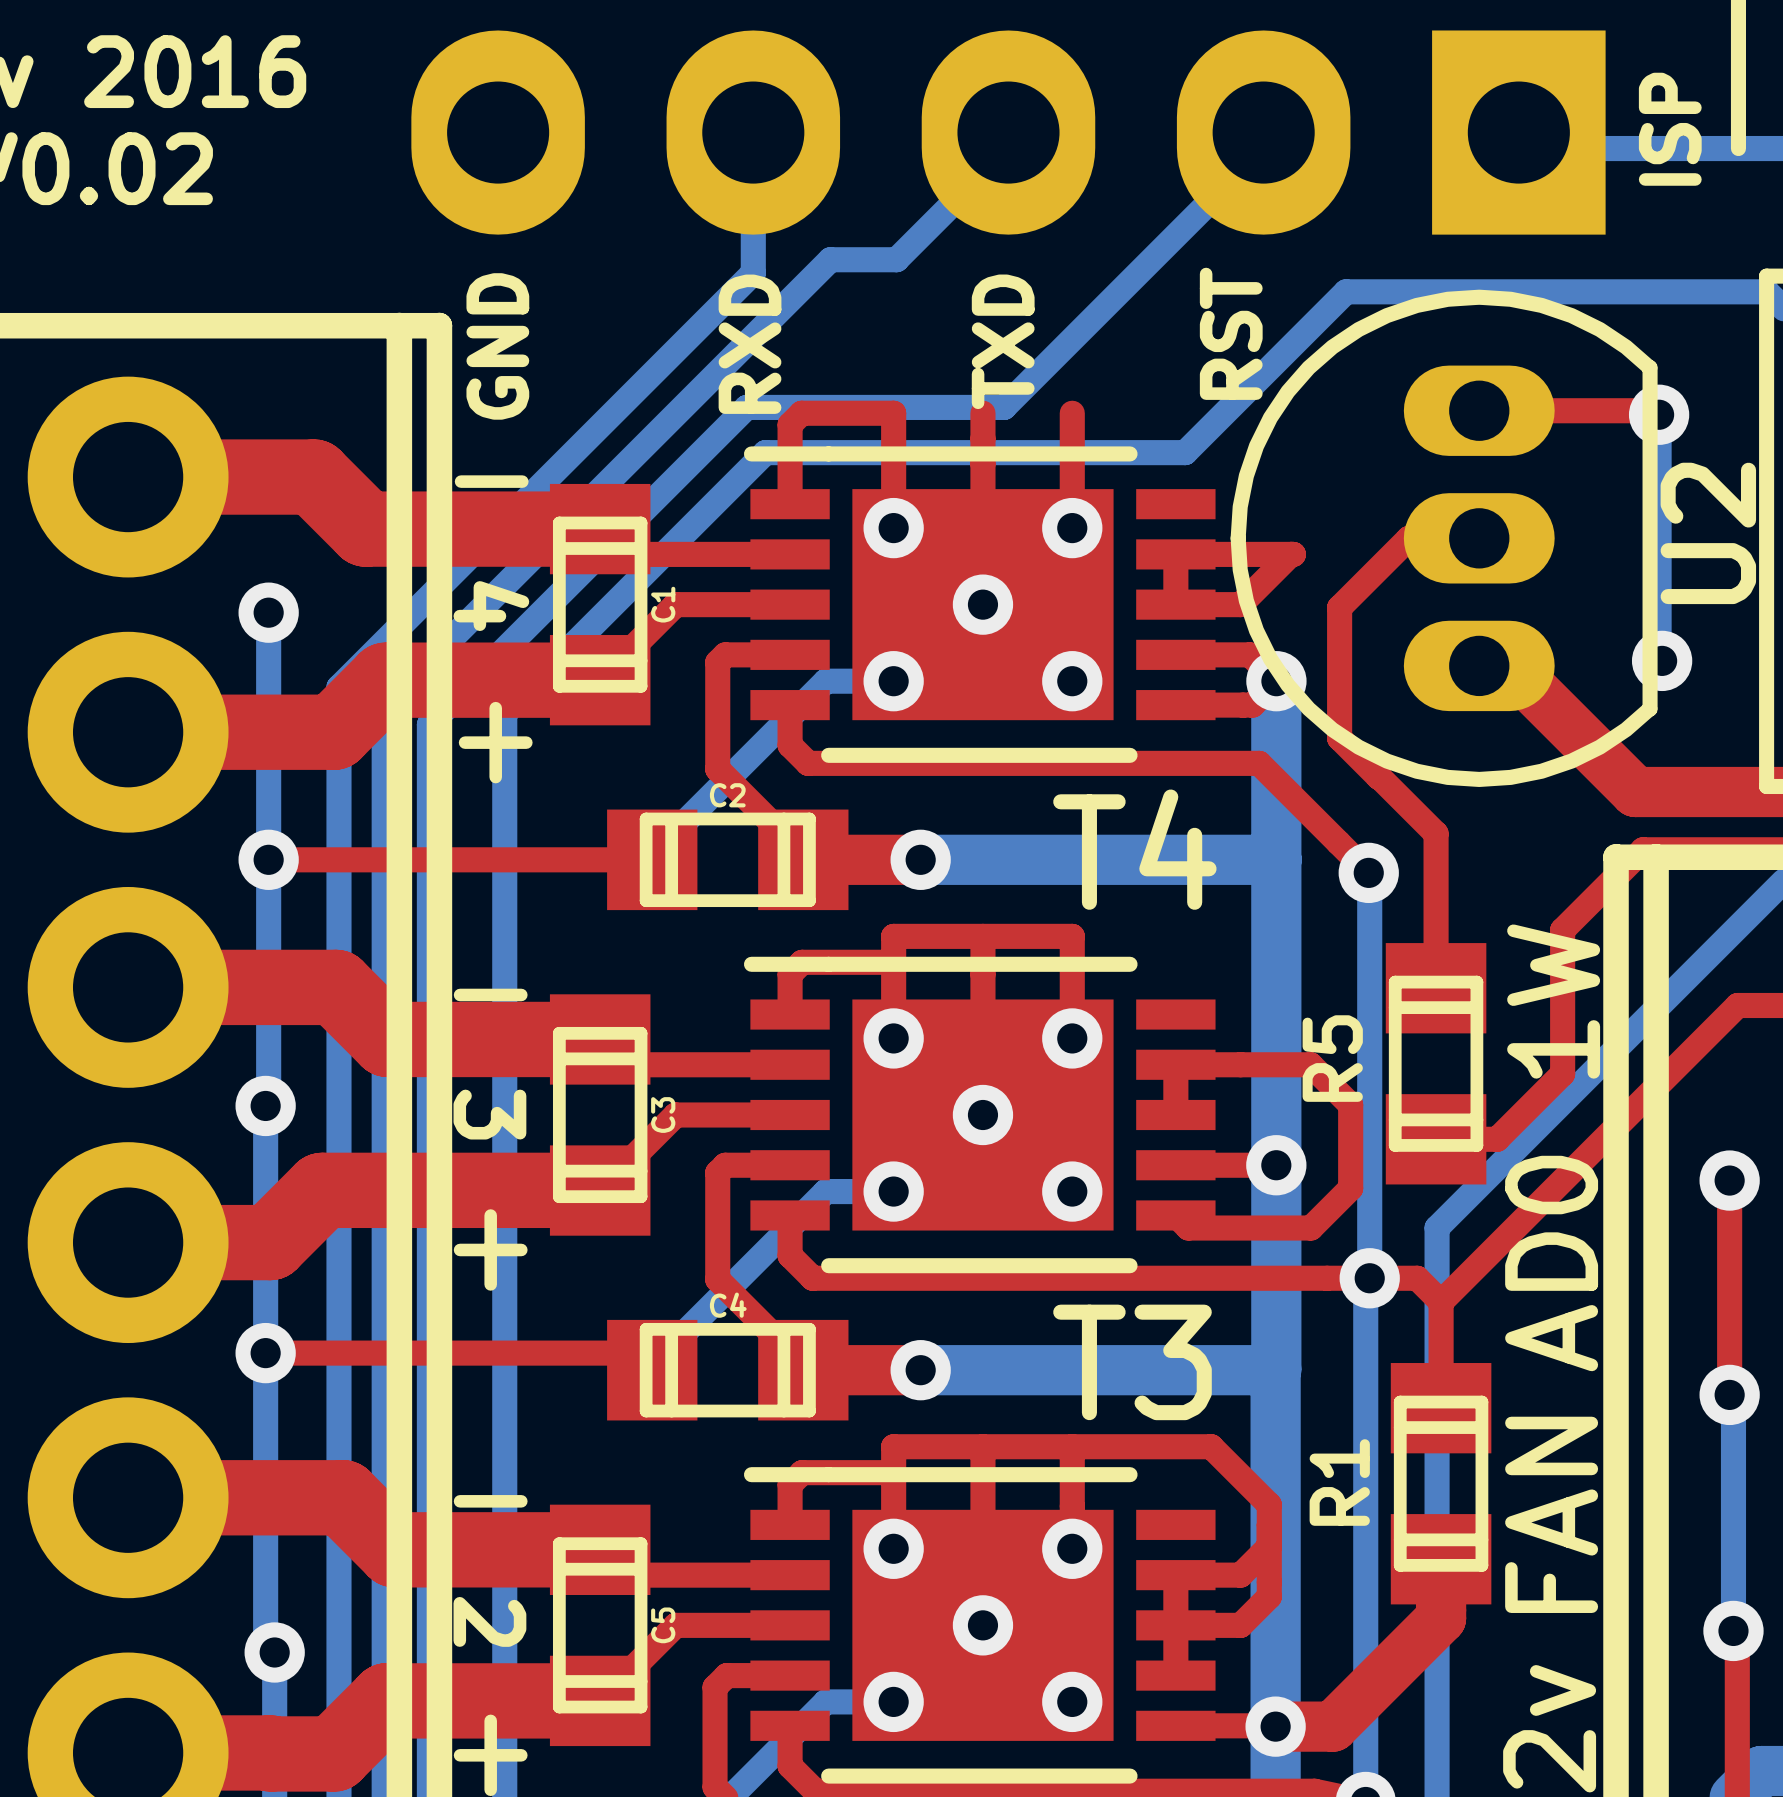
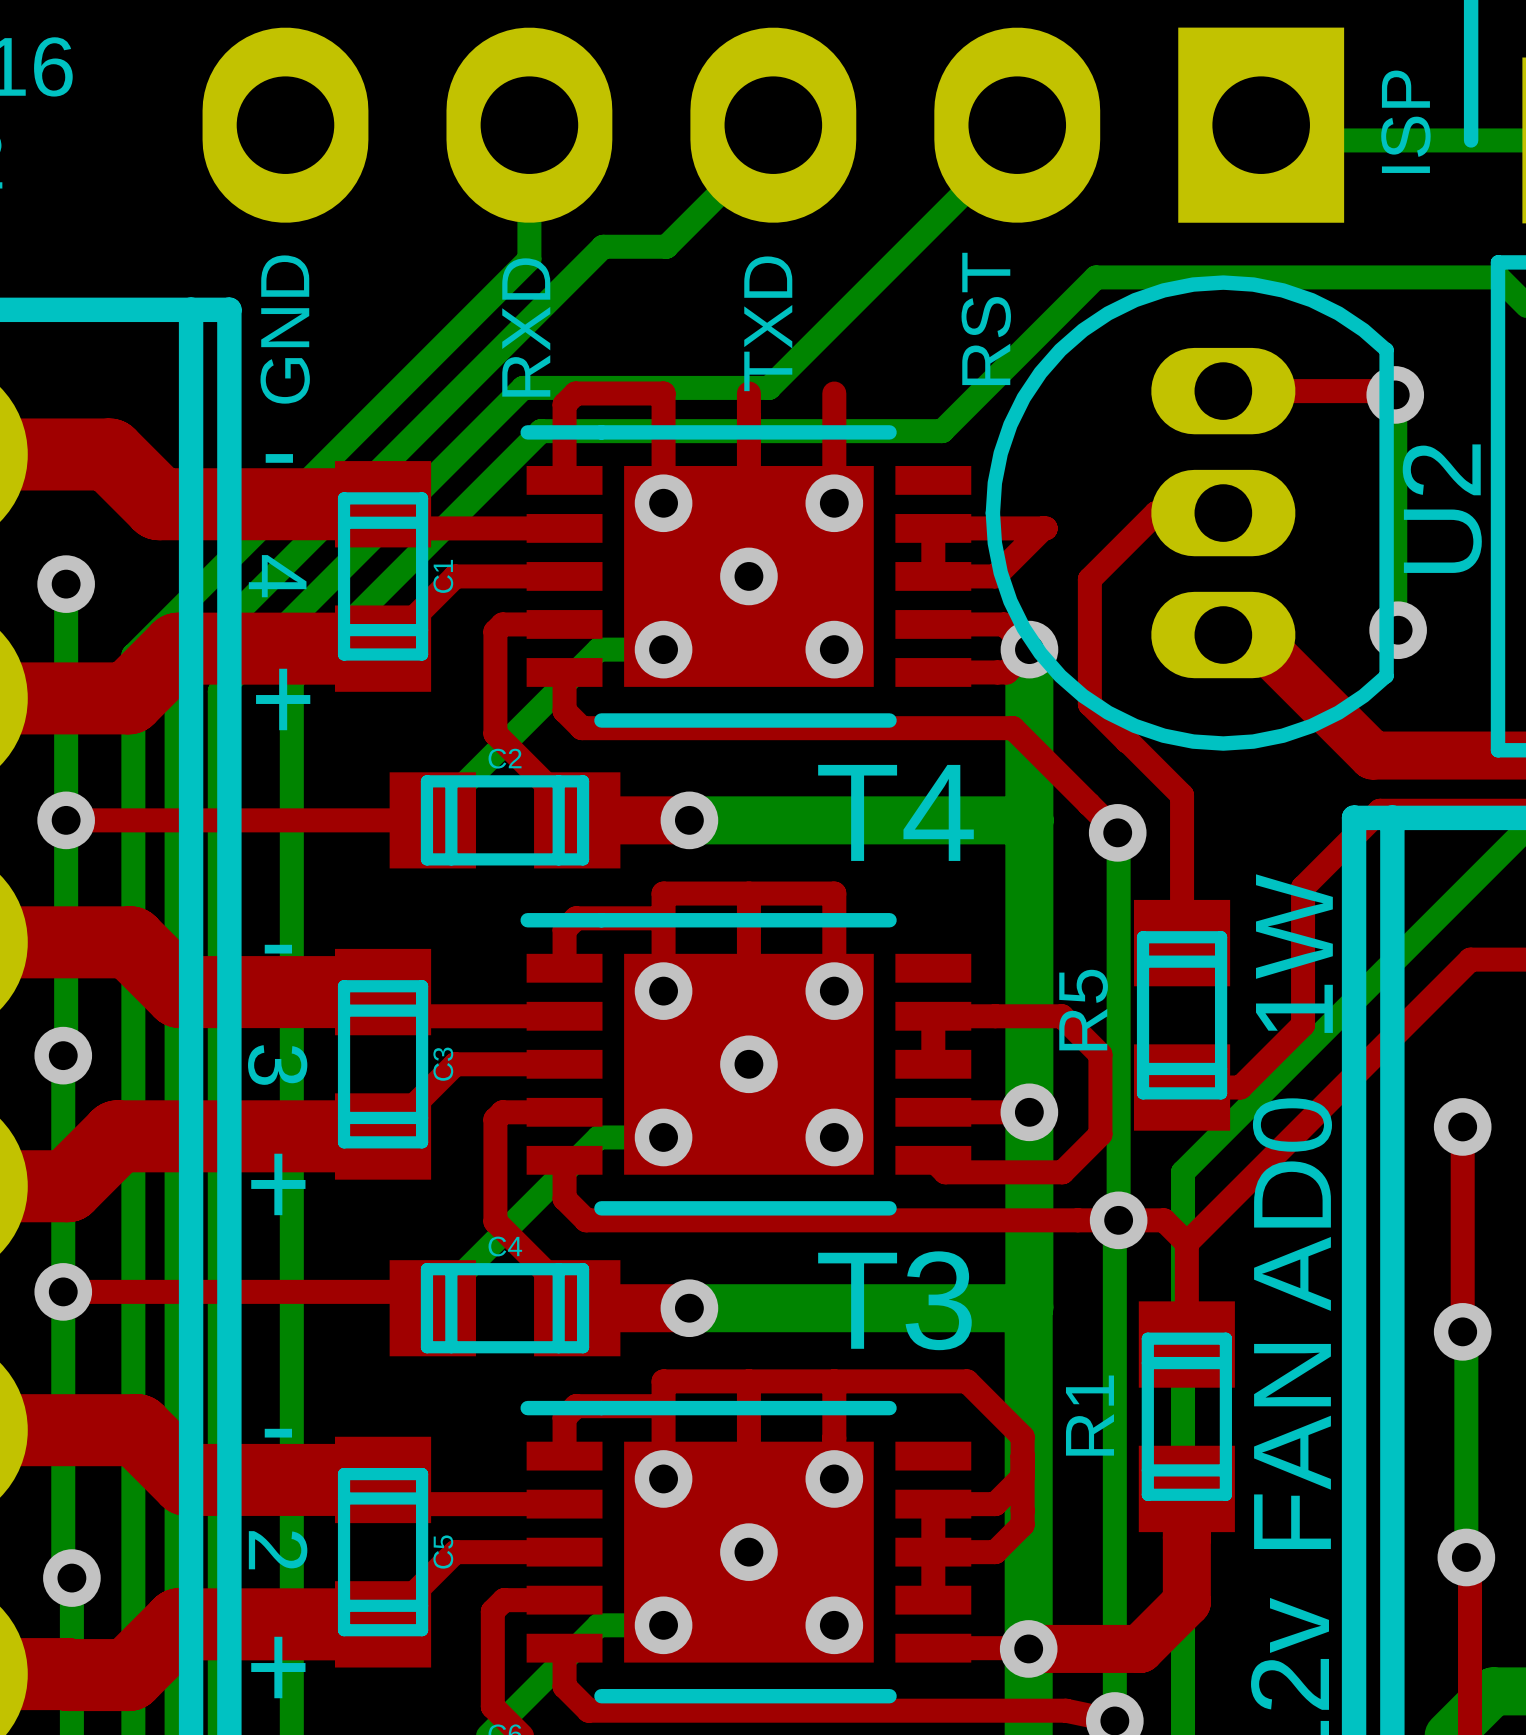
top track: (1441, 1618) (1332, 1726) -> (1186, 1545) (1186, 1602) (1139, 1648) (1083, 1648)

